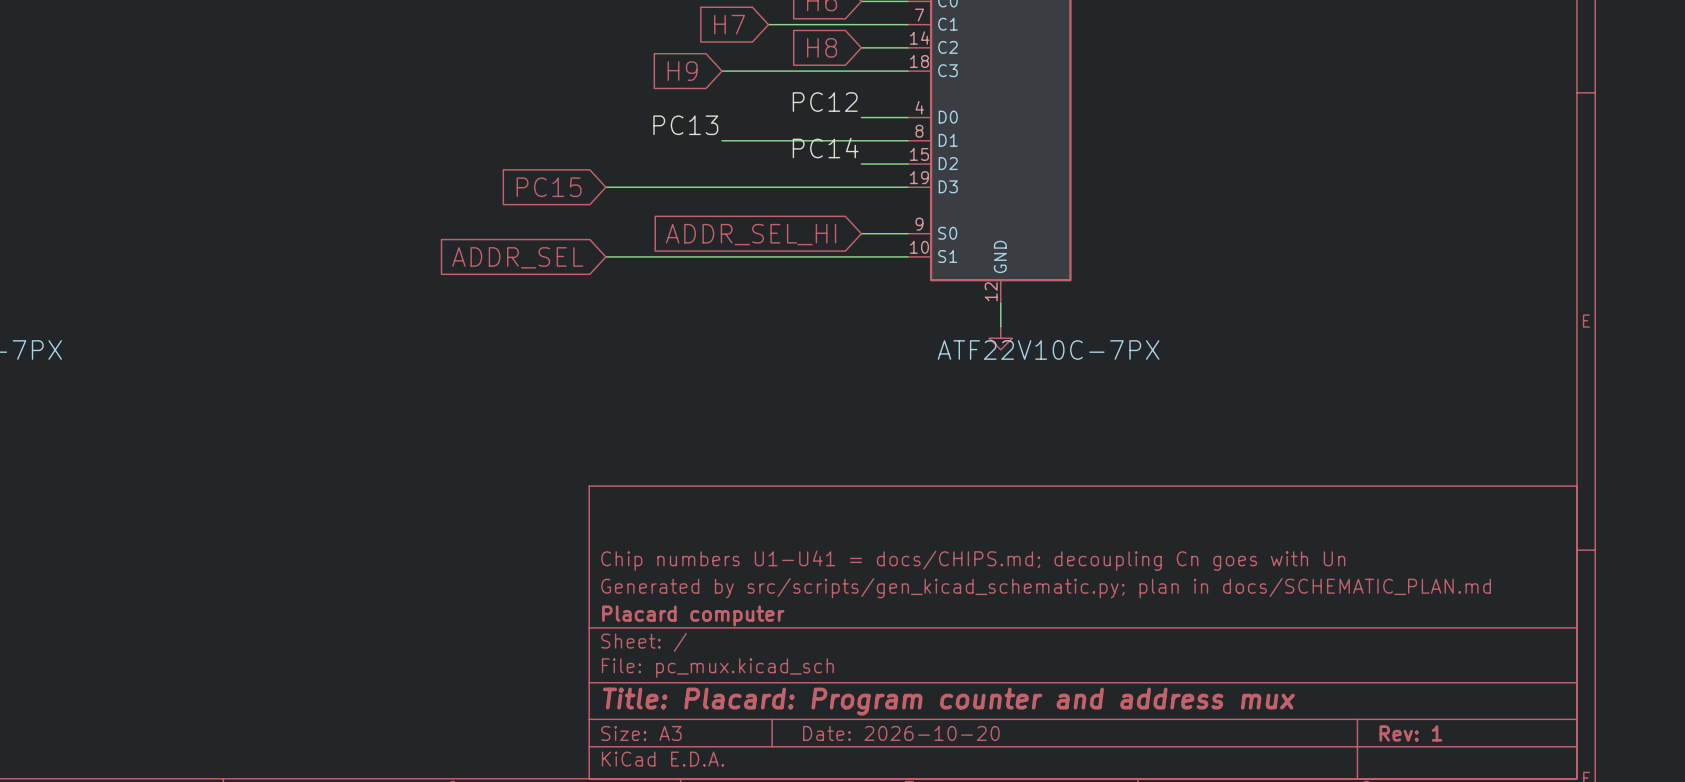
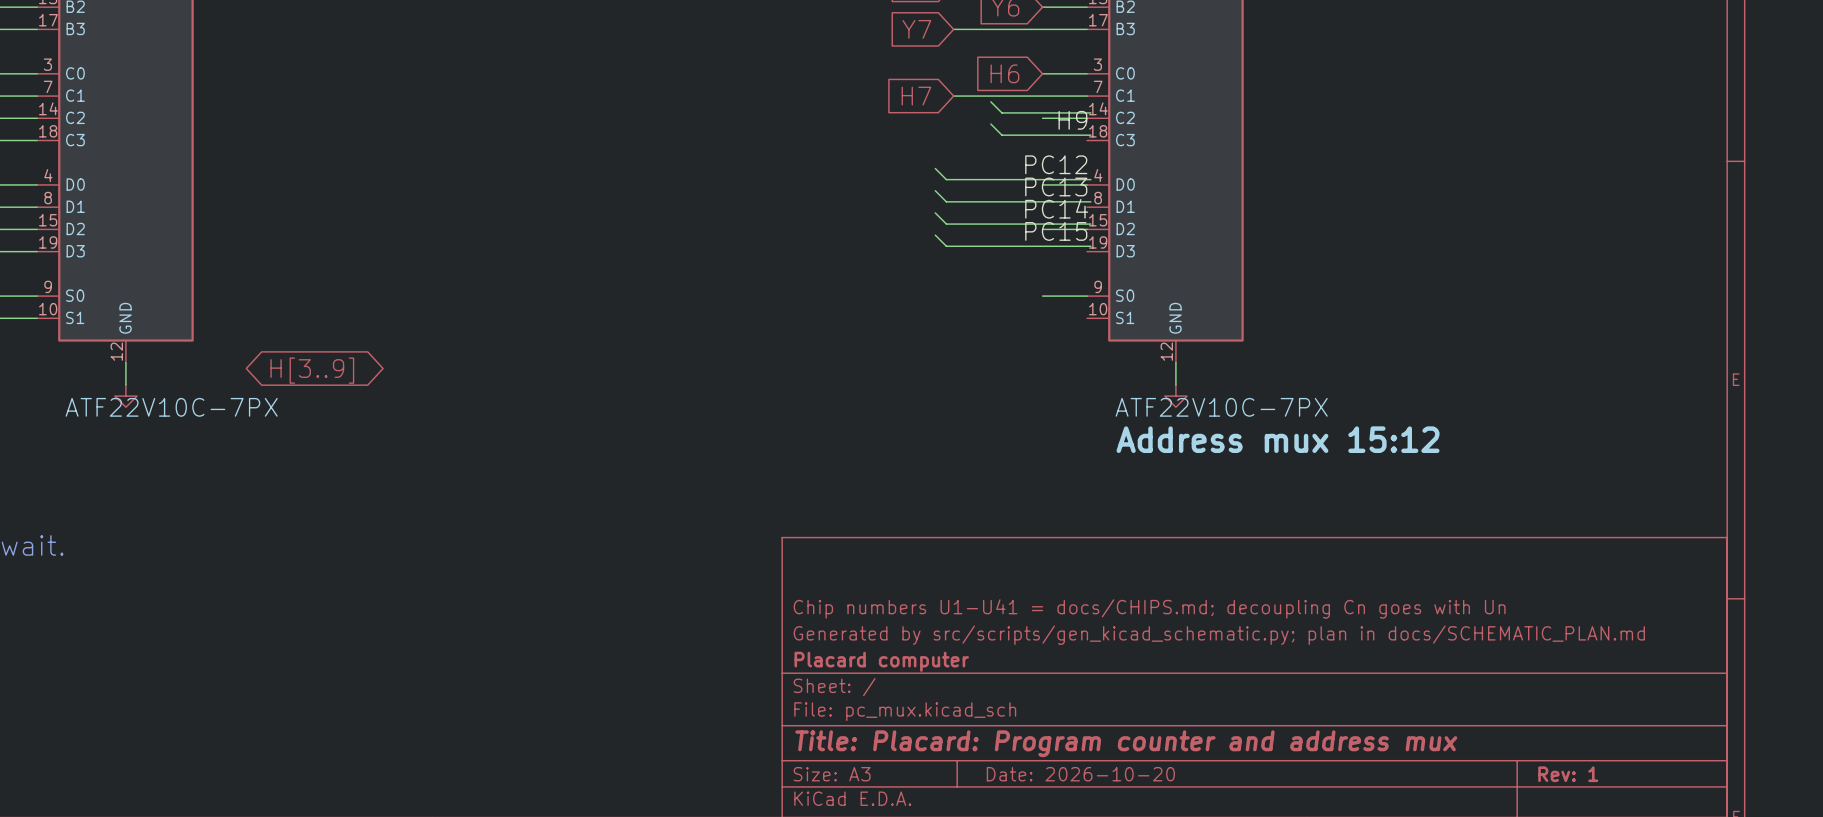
wire: none -> (990, 101) (1001, 112) (1090, 112)
global label: H8 (822, 47) -> none
label: none -> H9 (1072, 120)
wire: none -> (990, 124) (1001, 135) (1090, 135)
global label: H9 (682, 71) -> none
wire: (722, 71) (907, 71) -> none
wire: none -> (935, 168) (946, 179) (1090, 179)
label position: PC12 (825, 102) -> PC12 (1056, 164)
wire: none -> (935, 190) (946, 201) (1090, 201)
label position: PC13 (685, 125) -> PC13 (1056, 186)
wire: (722, 140) (907, 140) -> none
wire: none -> (935, 212) (946, 224) (1090, 224)
label position: PC14 (825, 148) -> PC14 (1056, 208)
label: none -> PC15 (1056, 231)
wire: none -> (935, 235) (946, 246) (1090, 246)
global label: PC15 (549, 187) -> none
wire: (605, 187) (907, 187) -> none
global label: ADDR_SEL_HI (751, 234) -> none
wire: (605, 256) (907, 256) -> none
global label: ADDR_SEL (517, 257) -> none
global label: none -> H[3..9] (312, 370)
part text: none -> Address mux 15:12 (1278, 439)

